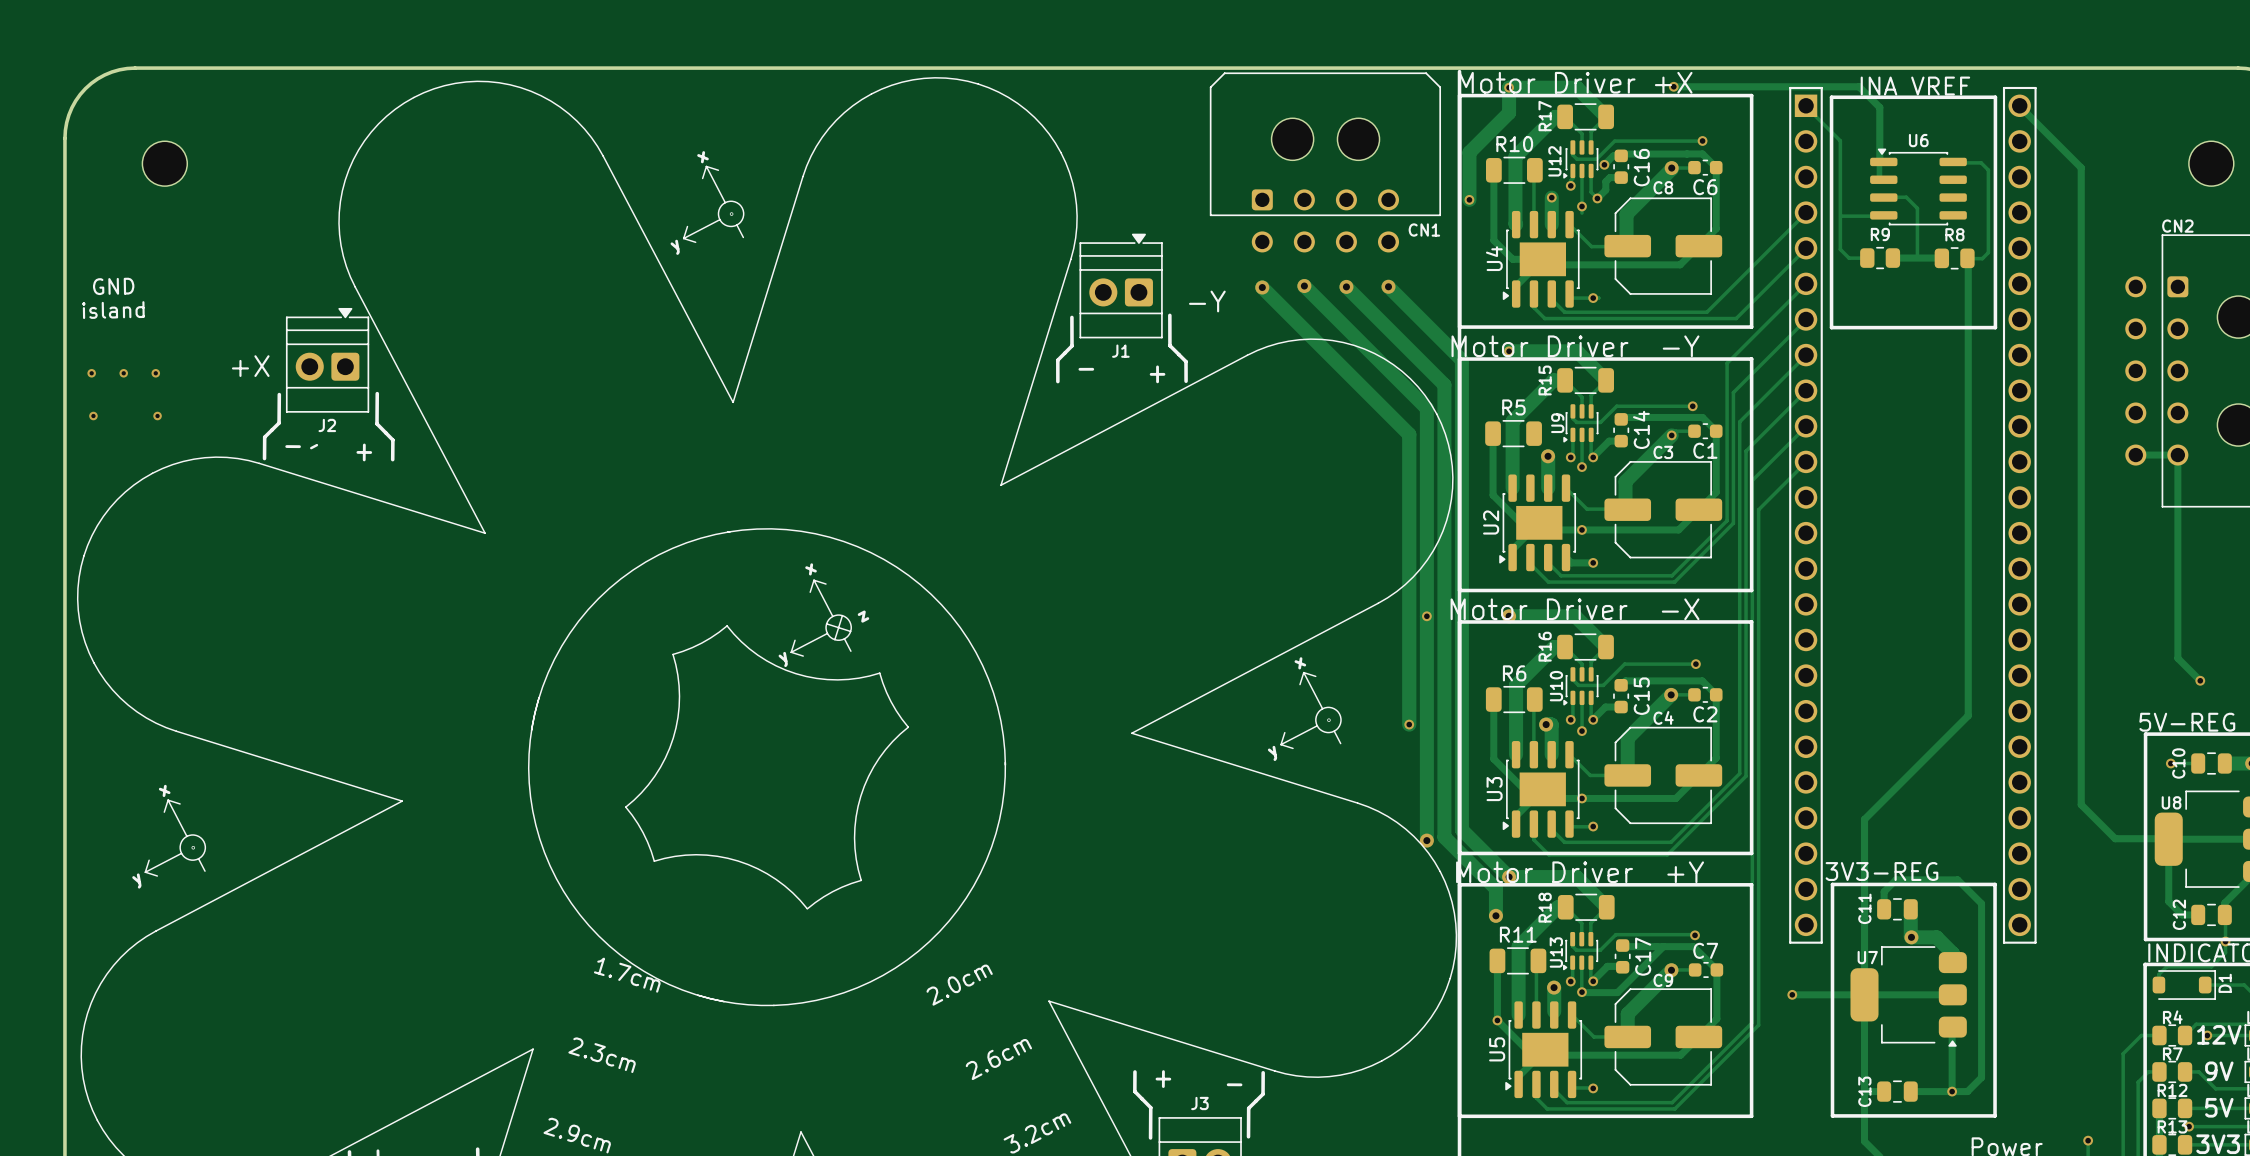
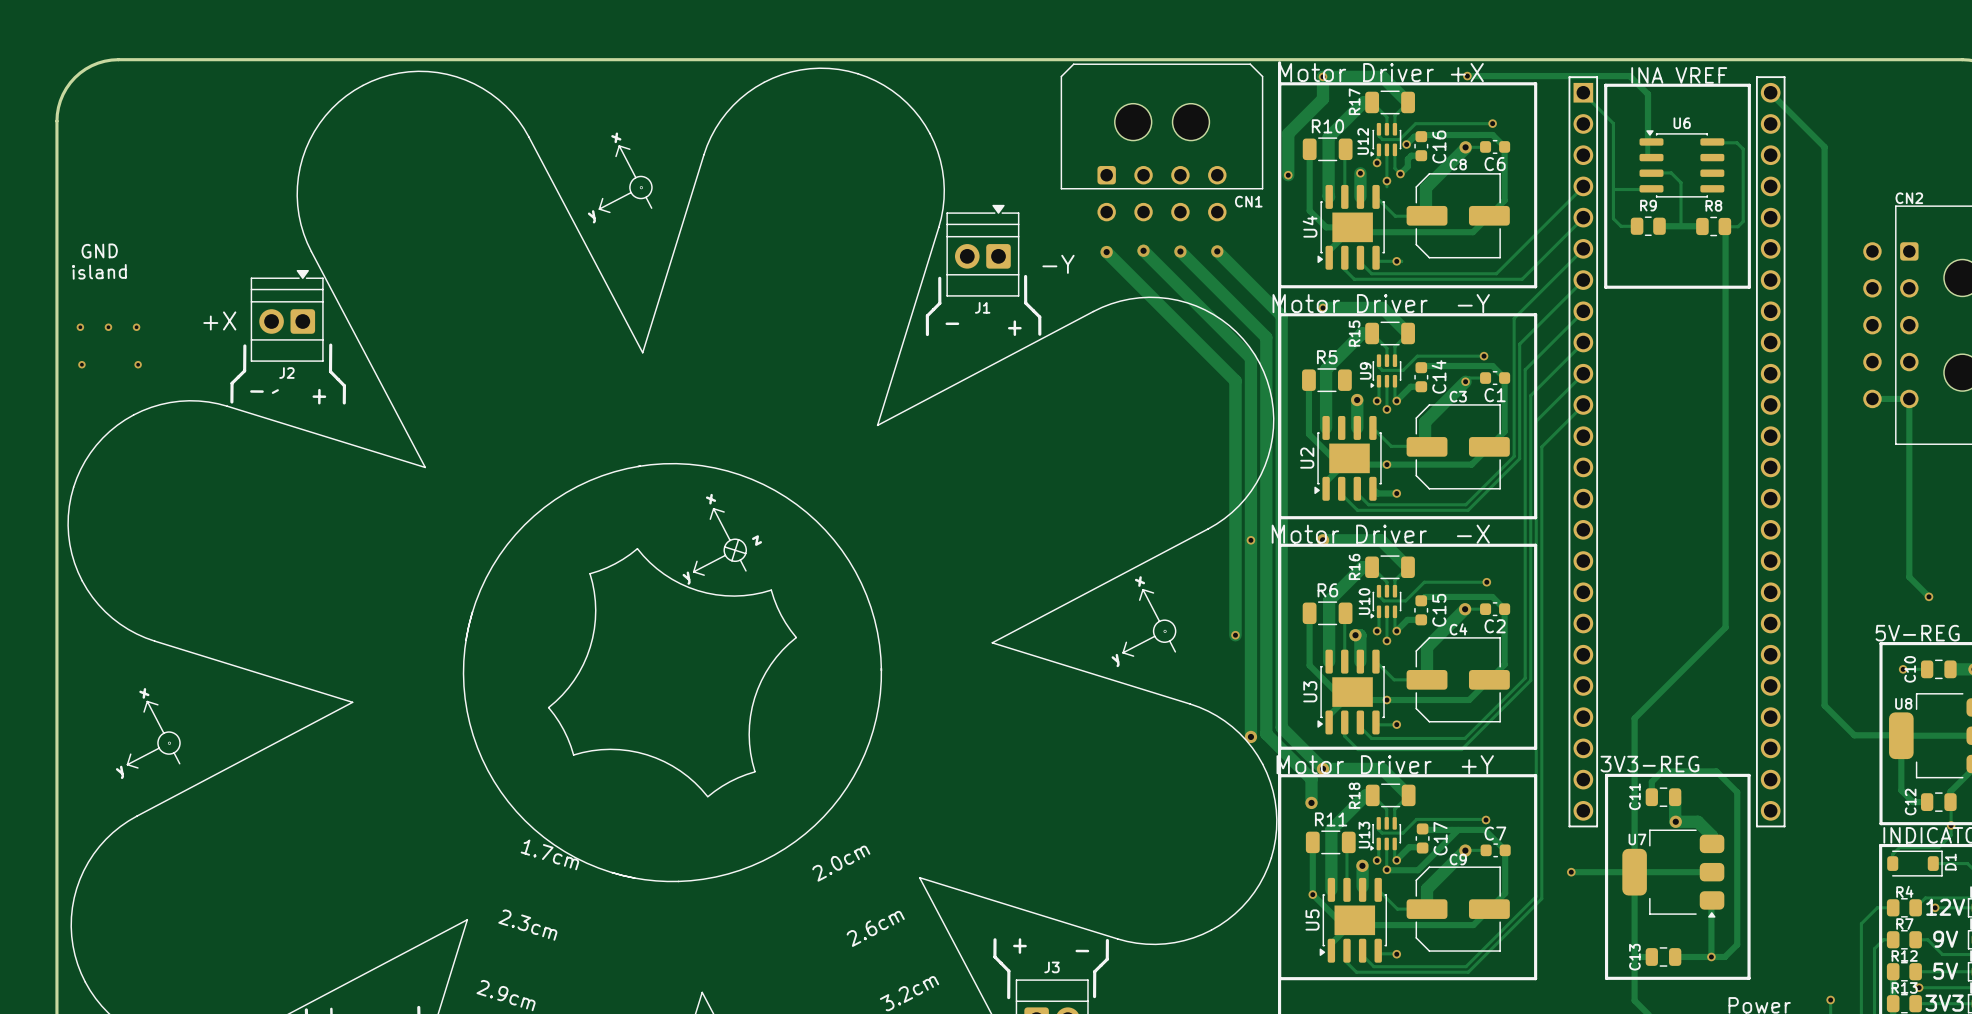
part: (164, 163) -> none
part: (2211, 163) -> none

